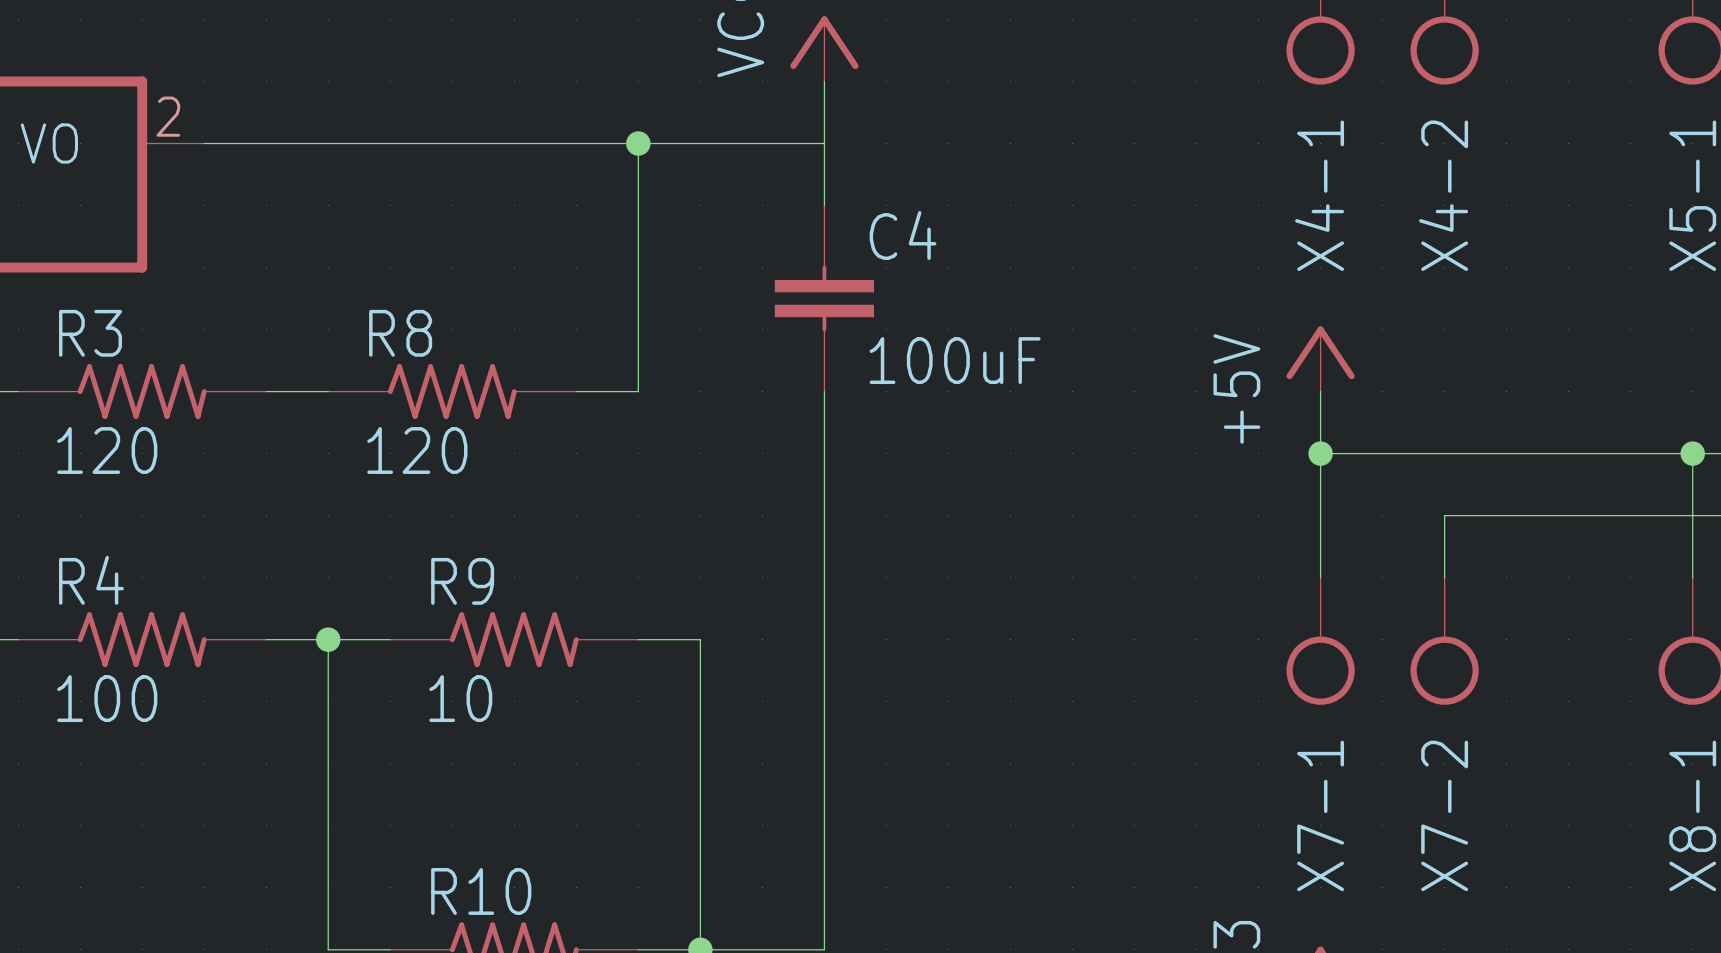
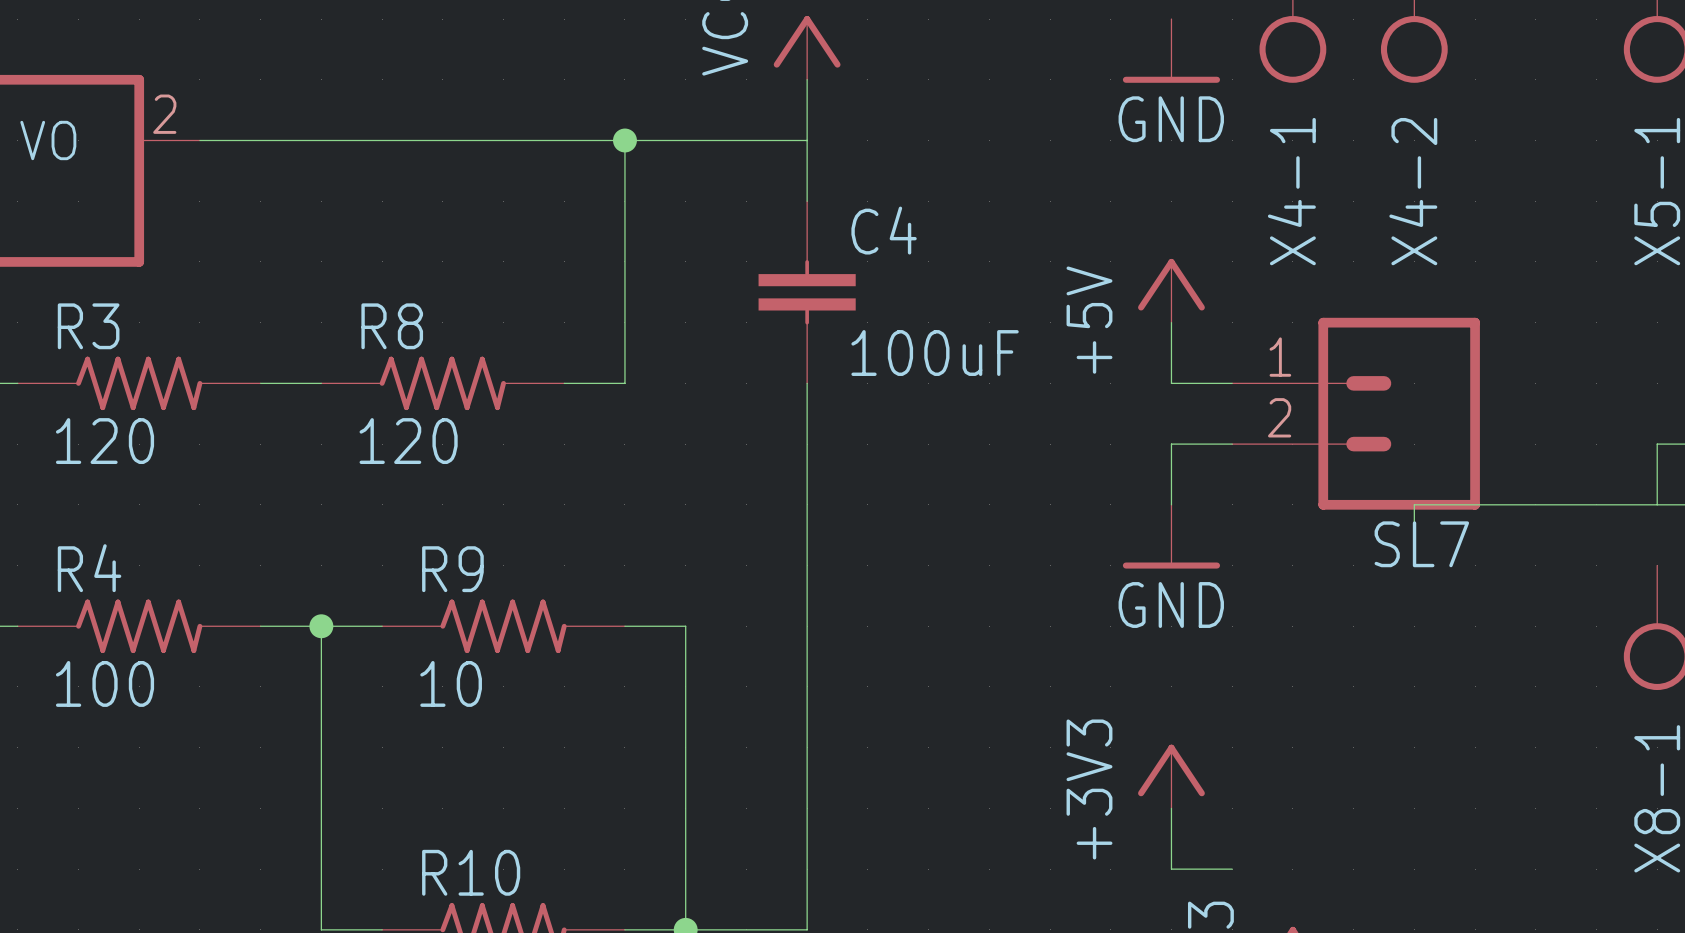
power symbol: none -> GND (1171, 50)
wire: none -> (1171, 322) (1171, 383) (1232, 383)
power symbol position: +5V (1320, 359) -> +5V (1171, 290)
wire: (1320, 391) (1320, 577) -> none
SL7: none -> (1356, 413)
wire: none -> (1232, 444) (1171, 444) (1171, 504)
wire: (1320, 453) (1692, 453) -> none
junction: (1320, 453) -> none
junction: (1692, 453) -> none
wire: (1692, 515) (1692, 577) -> none
power symbol: none -> GND (1171, 536)
X7-1: (1320, 641) -> none
X7-2: (1444, 641) -> none
power symbol: none -> +3V3 (1171, 776)
wire: none -> (1171, 808) (1171, 869) (1232, 869)

